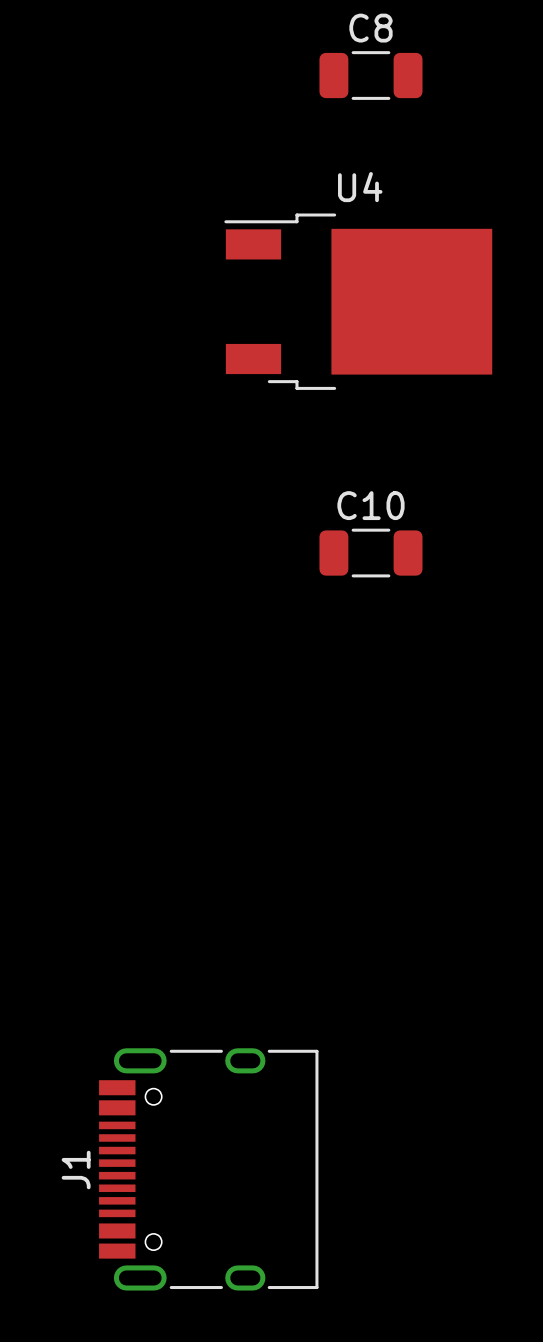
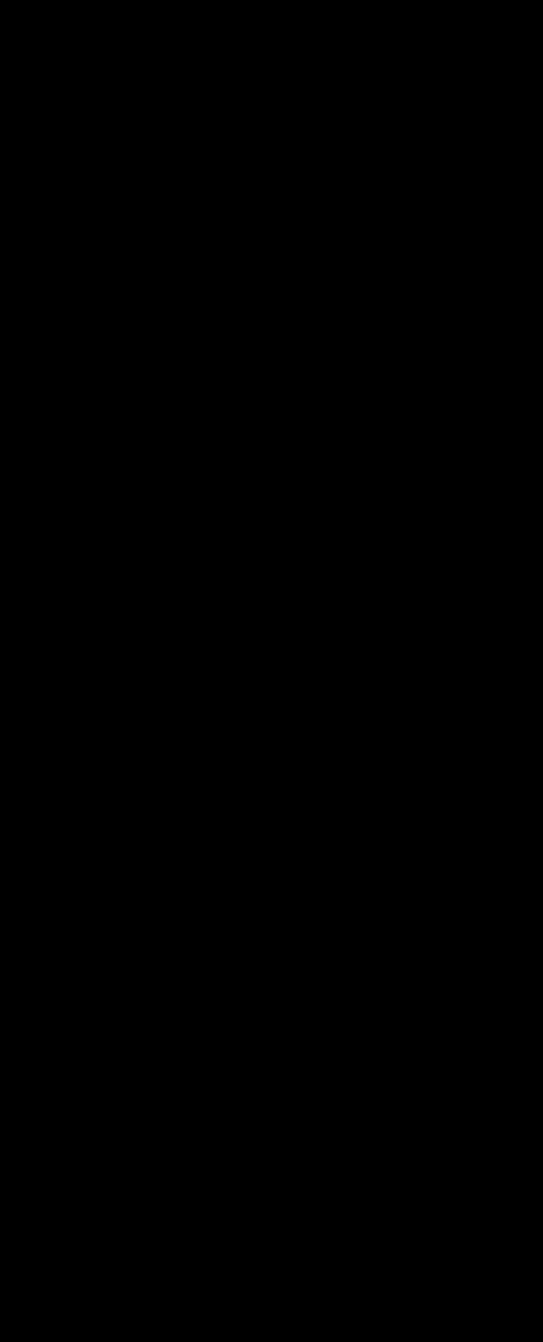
C8: (370, 75) -> none
U4: (358, 301) -> none
C10: (370, 553) -> none
J1: (208, 1169) -> none

